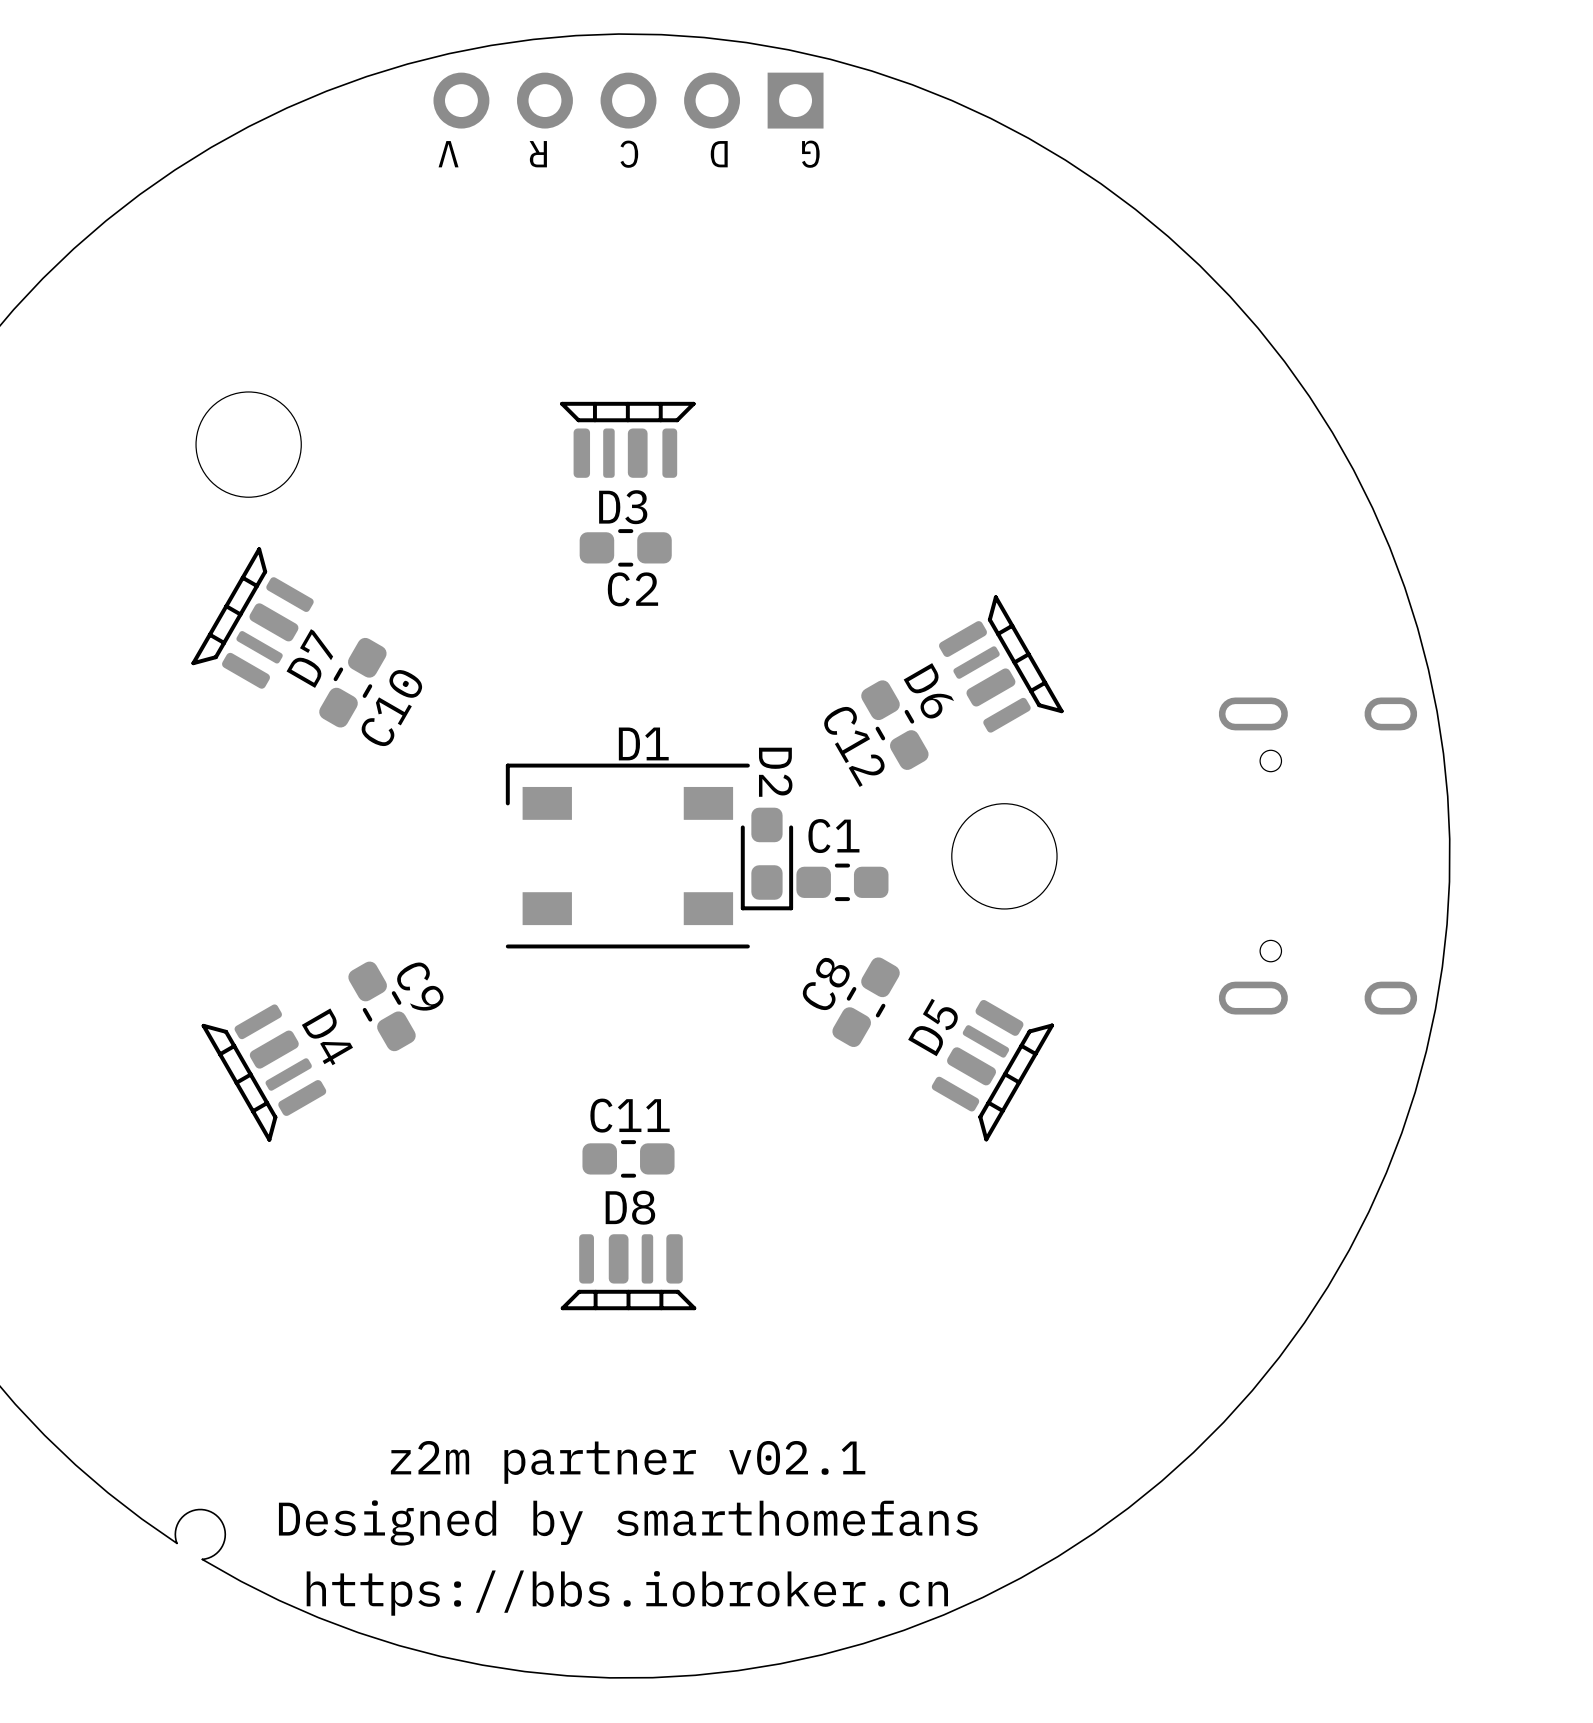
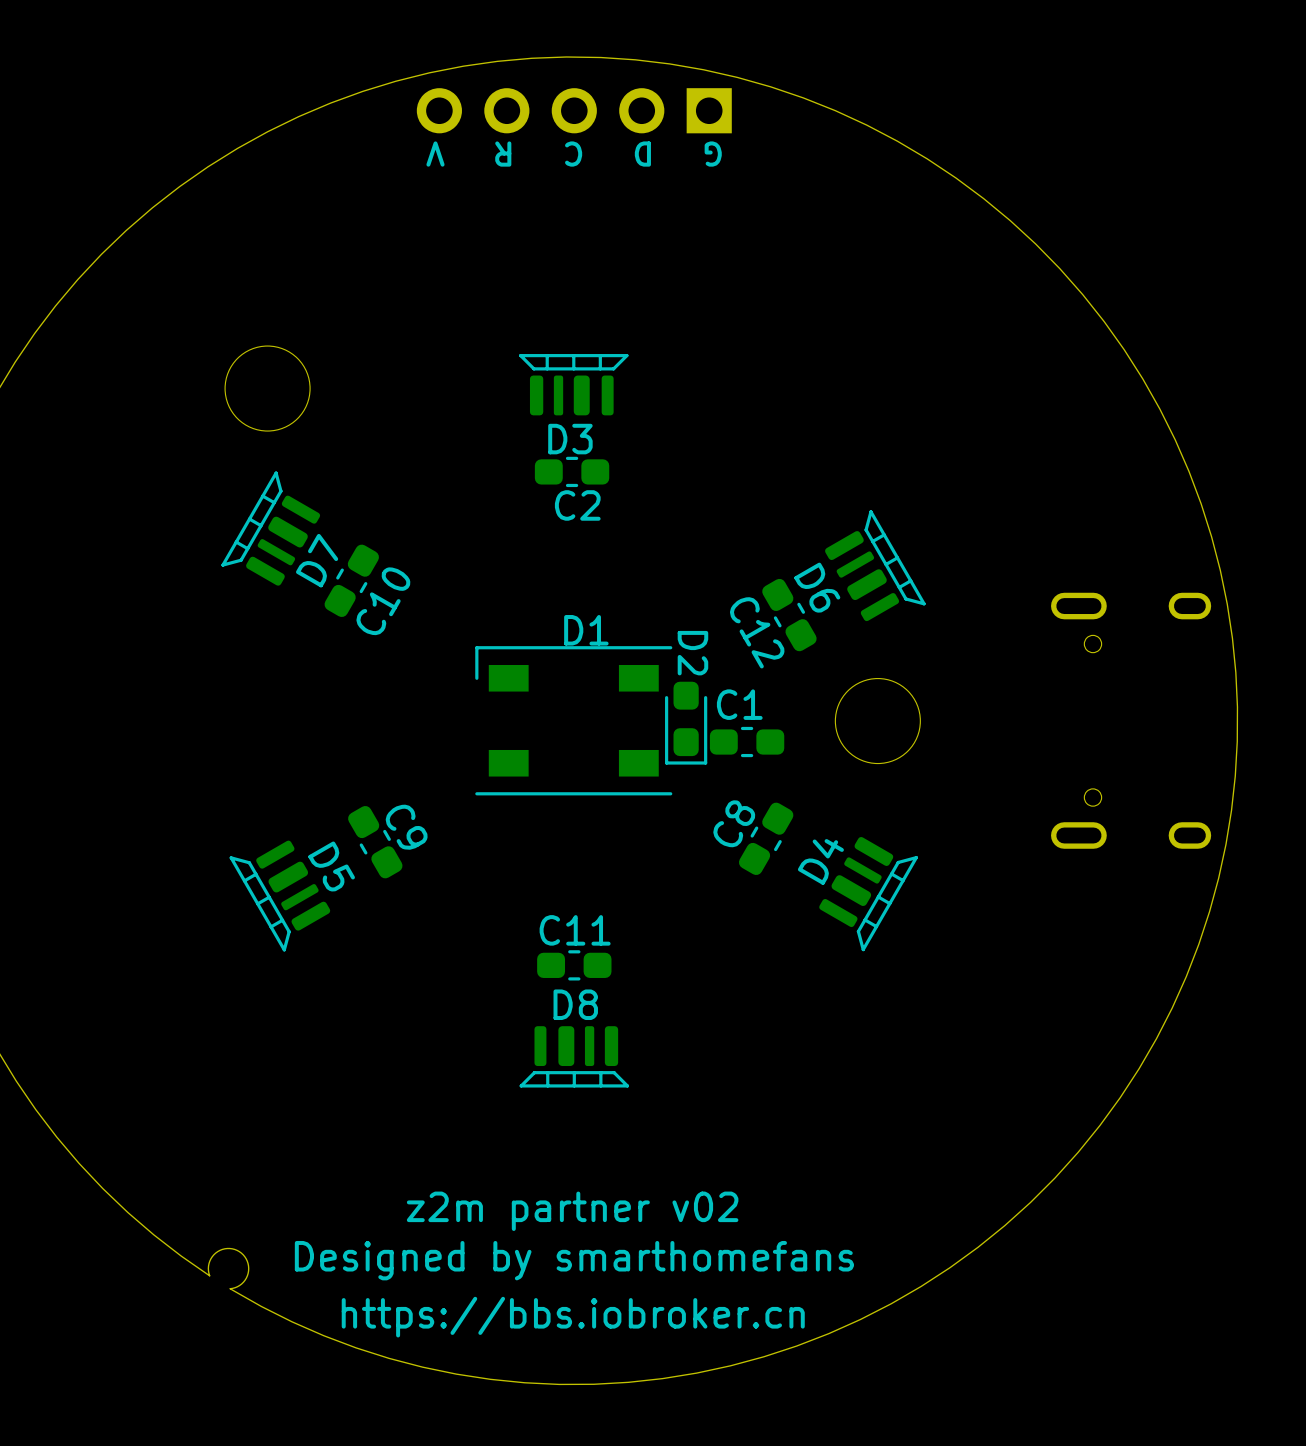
D5 name: D5 (933, 1027) -> D4 (820, 861)
D4 name: D4 (327, 1036) -> D5 (331, 866)
text: z2m partner v02.1 (628, 1462) -> z2m partner v02 (572, 1211)

